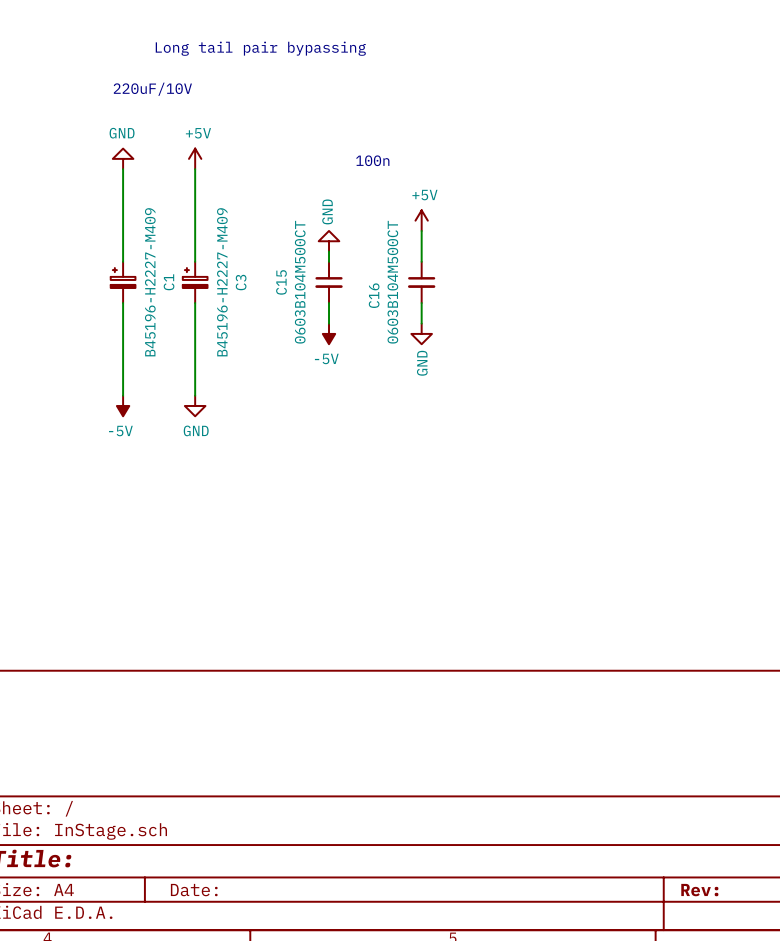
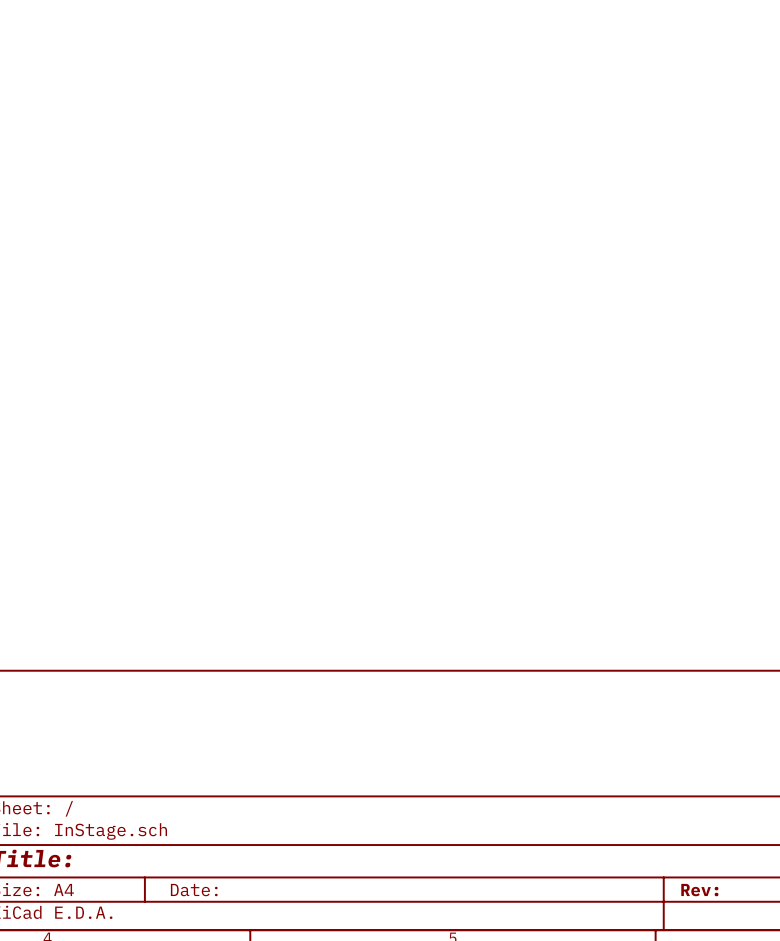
text: Long tail pair bypassing (260, 48) -> none
text: 220uF/10V (152, 89) -> none
power symbol: GND (123, 158) -> none
power symbol: +5V (195, 158) -> none
text: 100n (372, 160) -> none
wire: (123, 169) (123, 261) -> none
wire: (195, 169) (195, 261) -> none
power symbol: +5V (421, 220) -> none
wire: (421, 230) (421, 261) -> none
power symbol: GND (329, 241) -> none
wire: (329, 251) (329, 261) -> none
C1: B45196-H2227-M409 (123, 282) -> none
C3: B45196-H2227-M409 (195, 282) -> none
C15: 0603B104M500CT (329, 282) -> none
C16: 0603B104M500CT (421, 282) -> none
wire: (123, 303) (123, 395) -> none
wire: (195, 303) (195, 395) -> none
wire: (329, 303) (329, 323) -> none
wire: (421, 303) (421, 323) -> none
power symbol: -5V (329, 333) -> none
power symbol: GND (421, 333) -> none
power symbol: -5V (123, 405) -> none
power symbol: GND (195, 405) -> none

